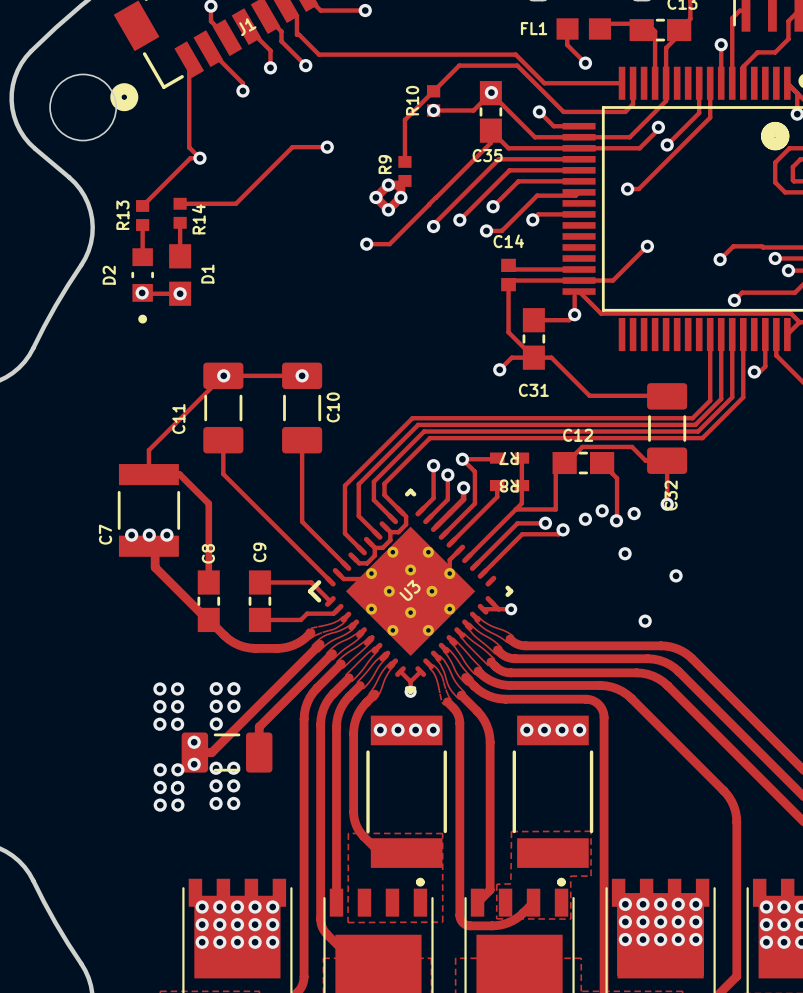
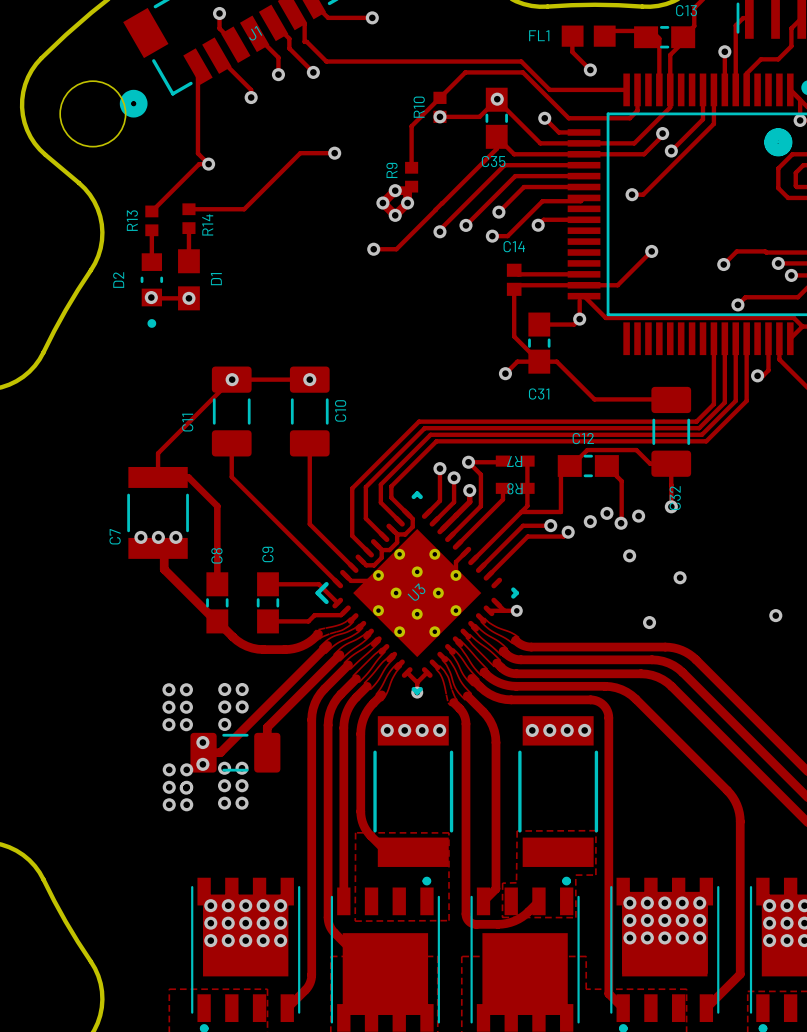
via: none -> (775, 615)

